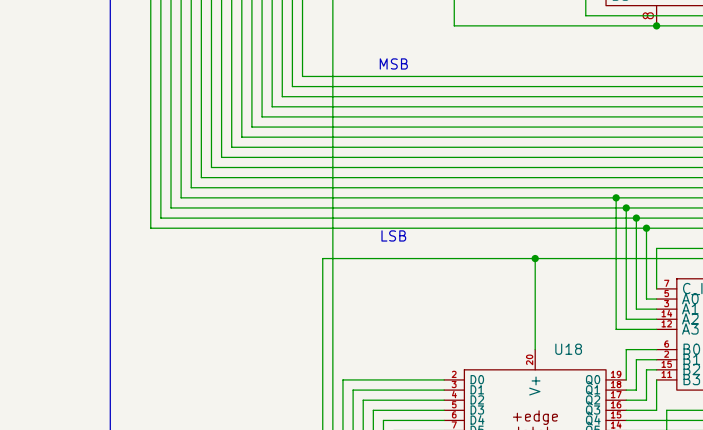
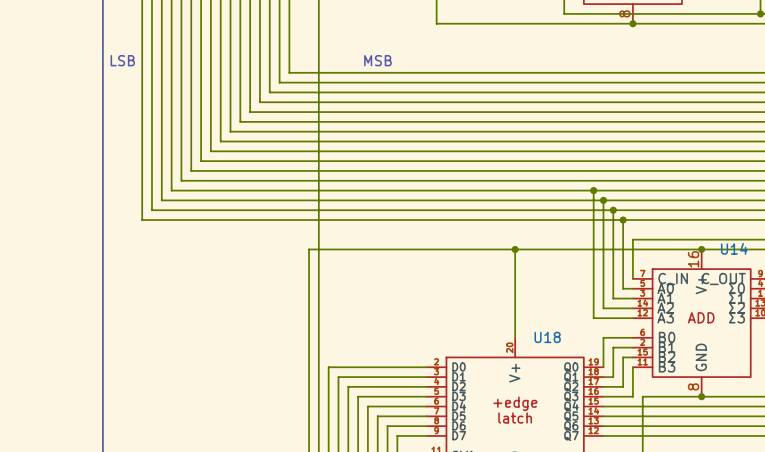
text: none -> LSB (122, 60)
text: LSB (393, 235) -> none

